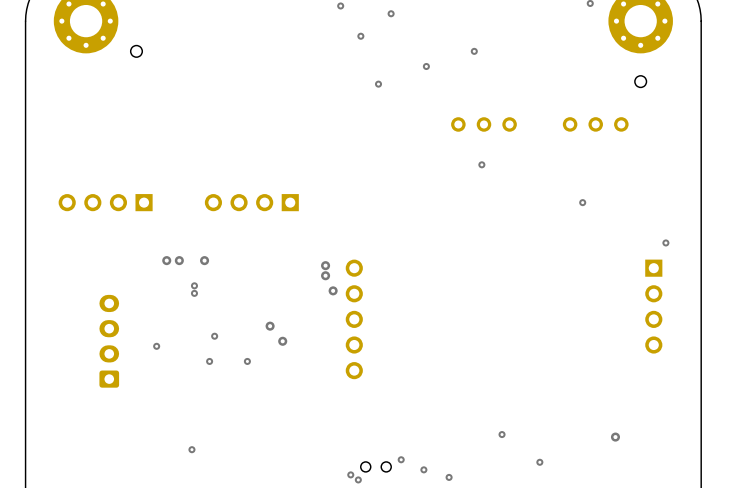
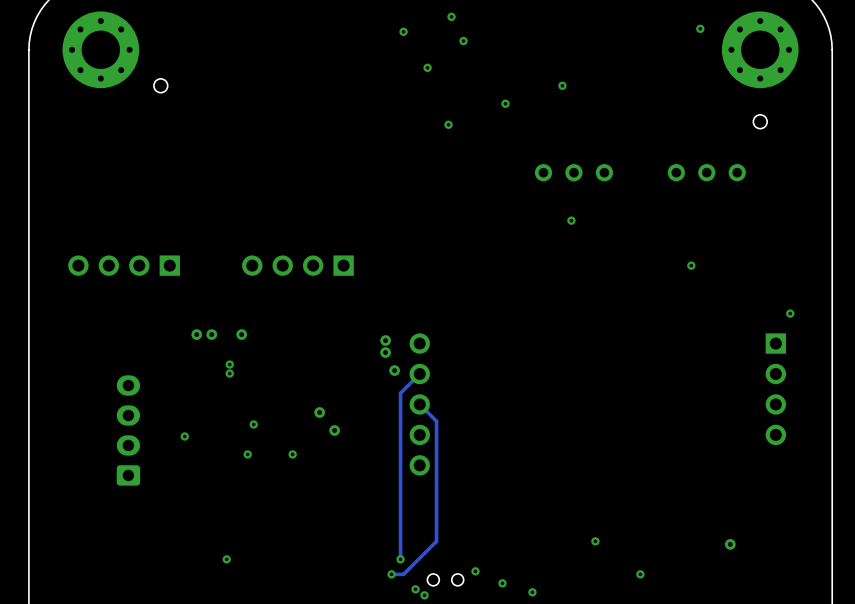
track: none -> (419, 374) (400, 393) (400, 559)
track: none -> (419, 404) (436, 421) (436, 541) (403, 574) (391, 574)
via: none -> (400, 559)
via: none -> (391, 574)

